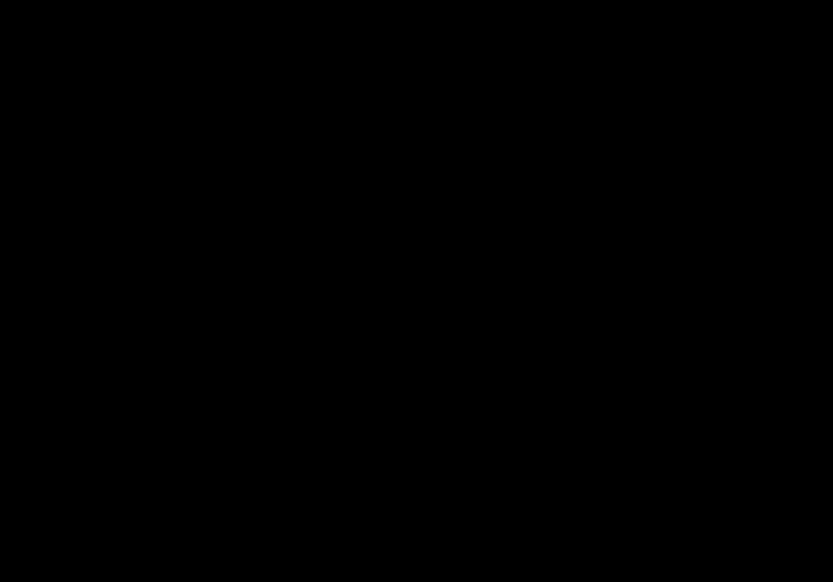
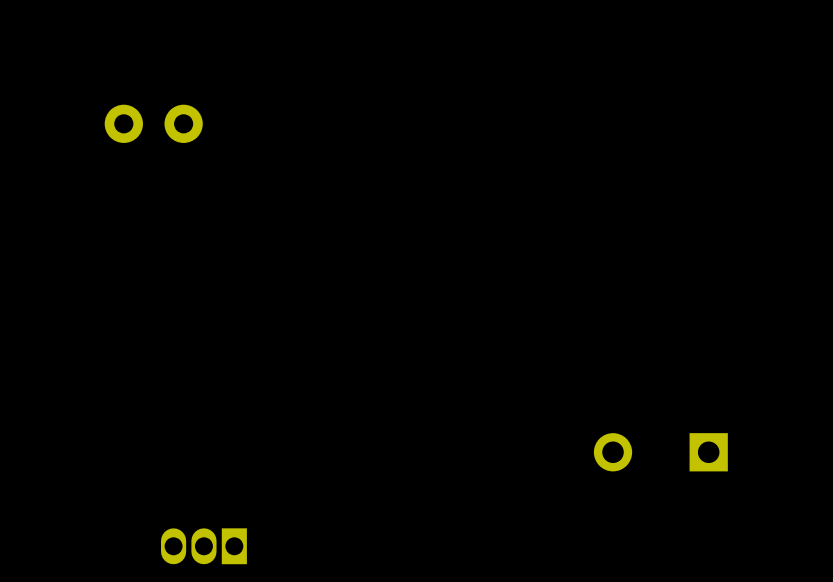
part: none -> (153, 123)
part: none -> (660, 452)
part: none -> (203, 546)

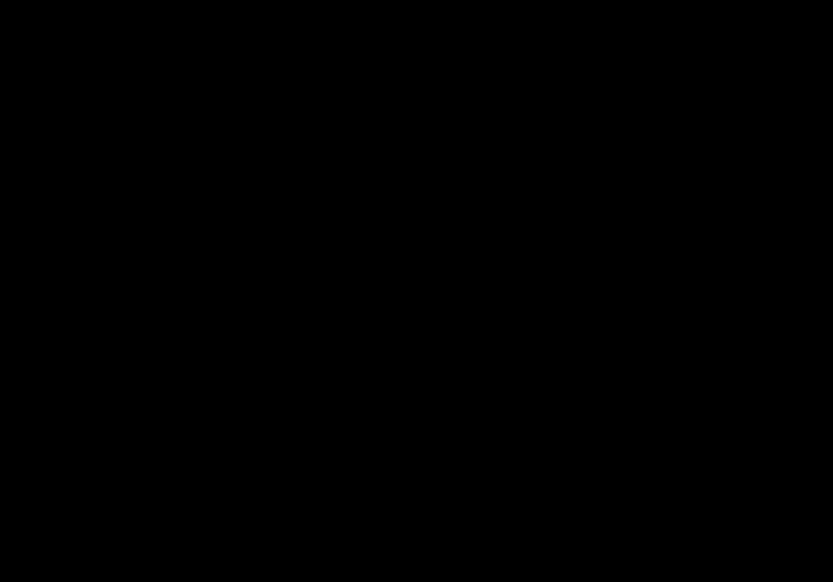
part: (153, 123) -> none
part: (660, 452) -> none
part: (203, 546) -> none

